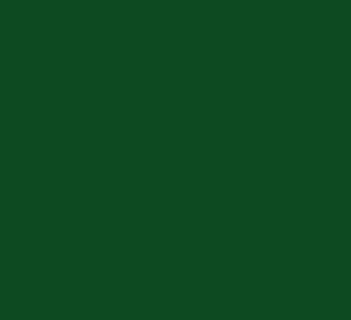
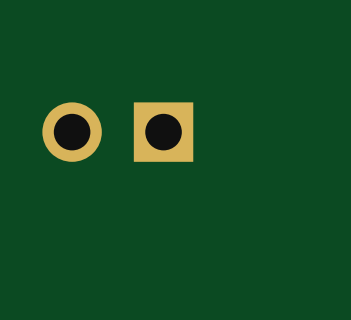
part: none -> (117, 132)

